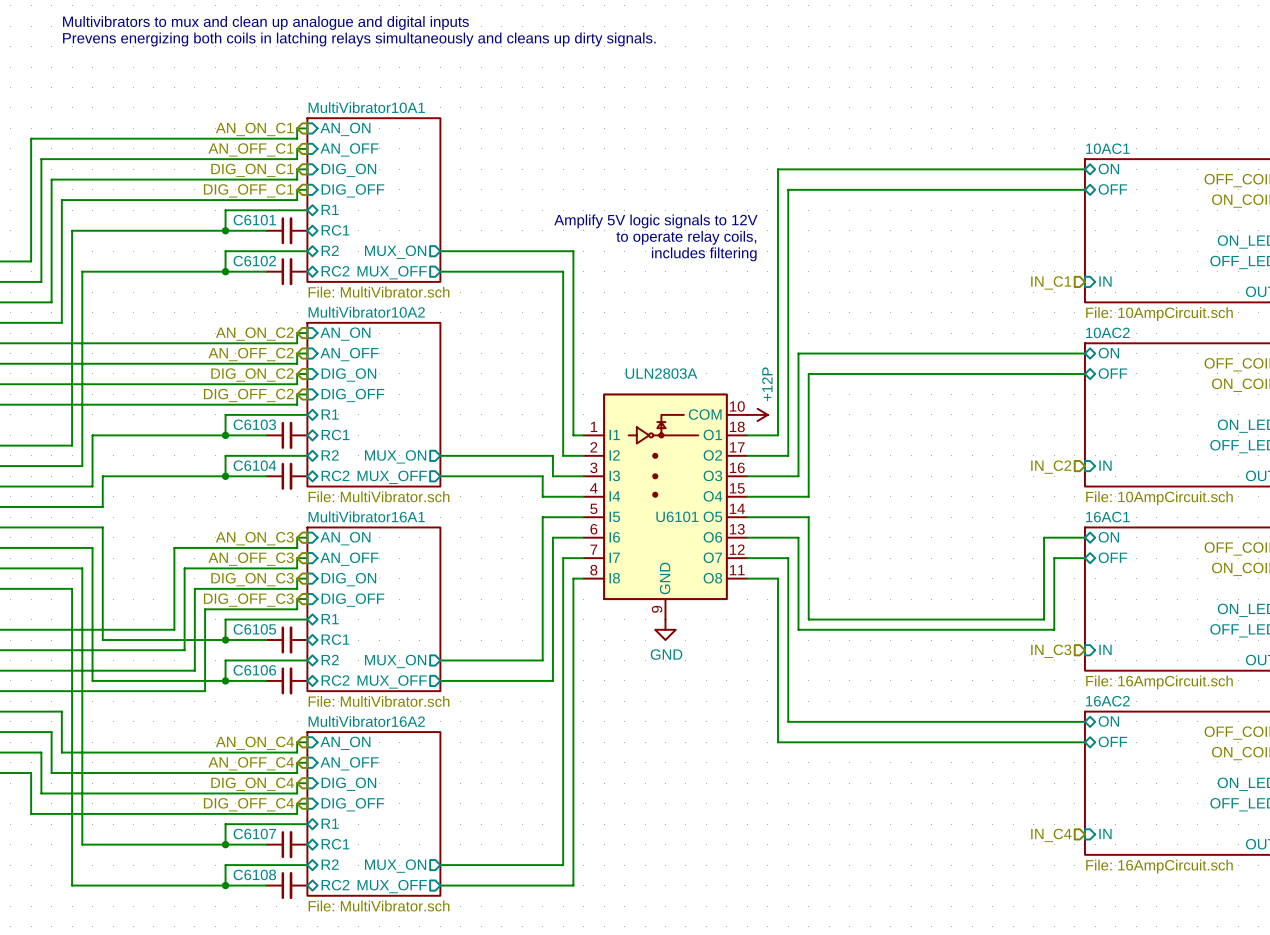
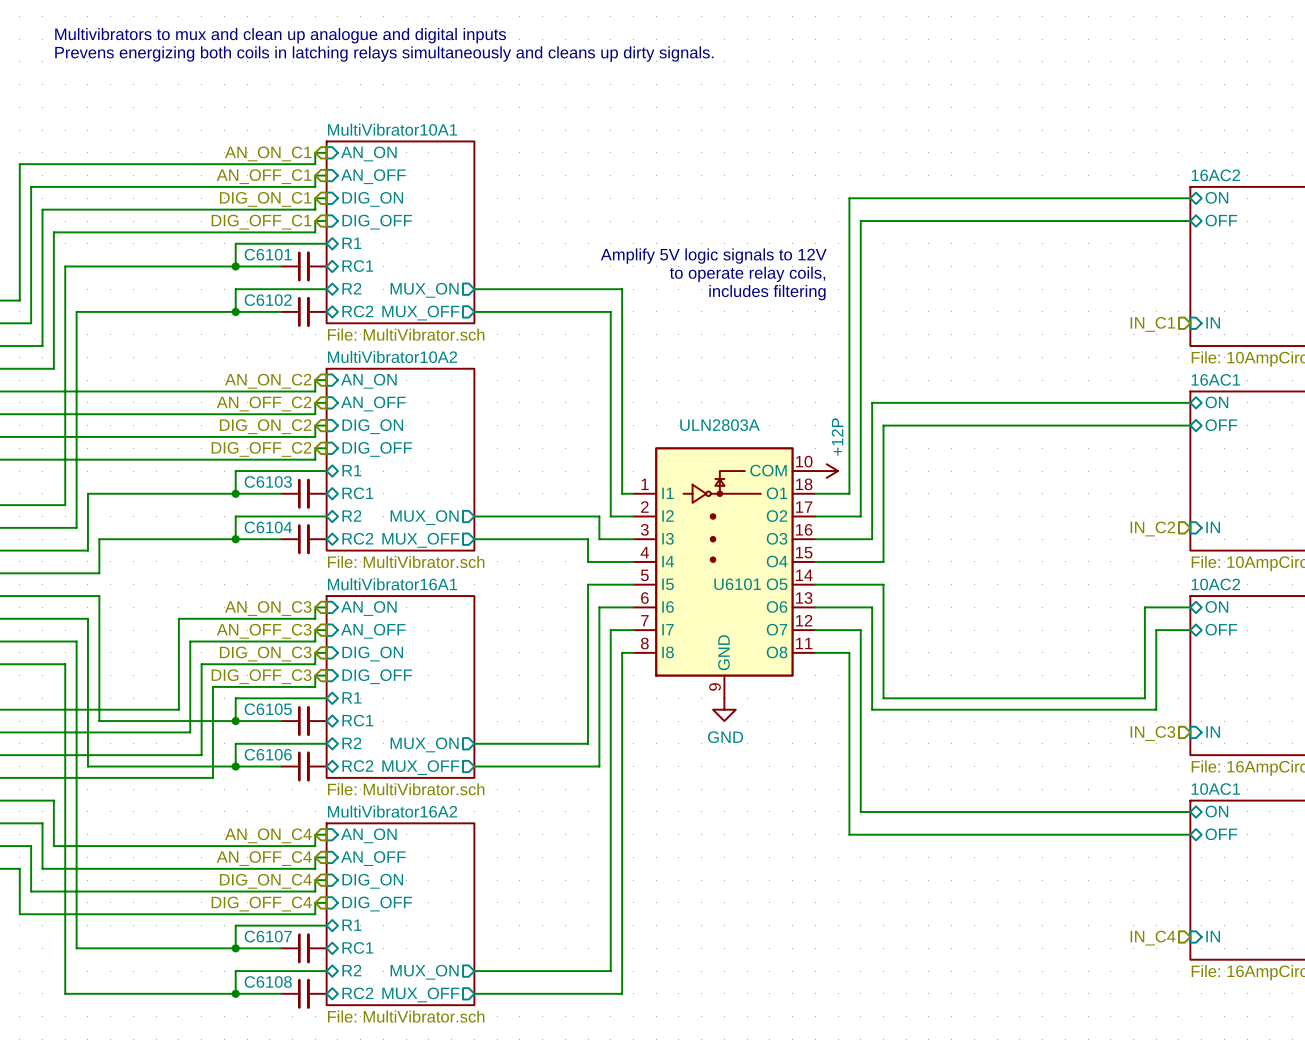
sheet 10AC1 name: 10AC1 (1107, 148) -> 16AC2 (1215, 175)
sheet 10AC2 name: 10AC2 (1107, 332) -> 16AC1 (1215, 379)
sheet 16AC1 name: 16AC1 (1107, 517) -> 10AC2 (1215, 584)
sheet 16AC2 name: 16AC2 (1107, 701) -> 10AC1 (1215, 789)

